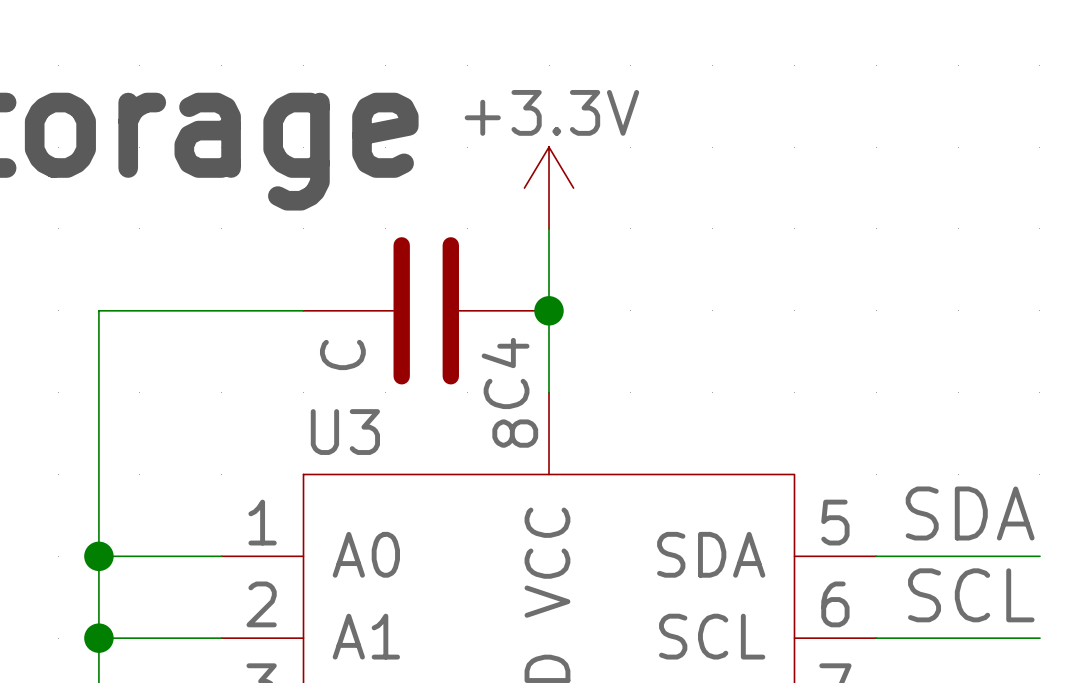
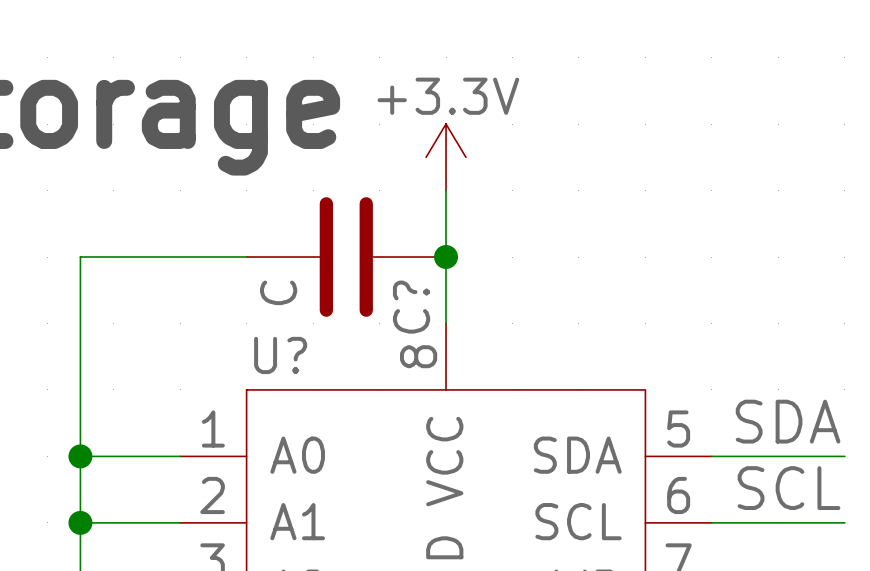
C4 name: C4 (505, 373) -> C? (411, 307)
U3 name: U3 (345, 432) -> U? (280, 355)

